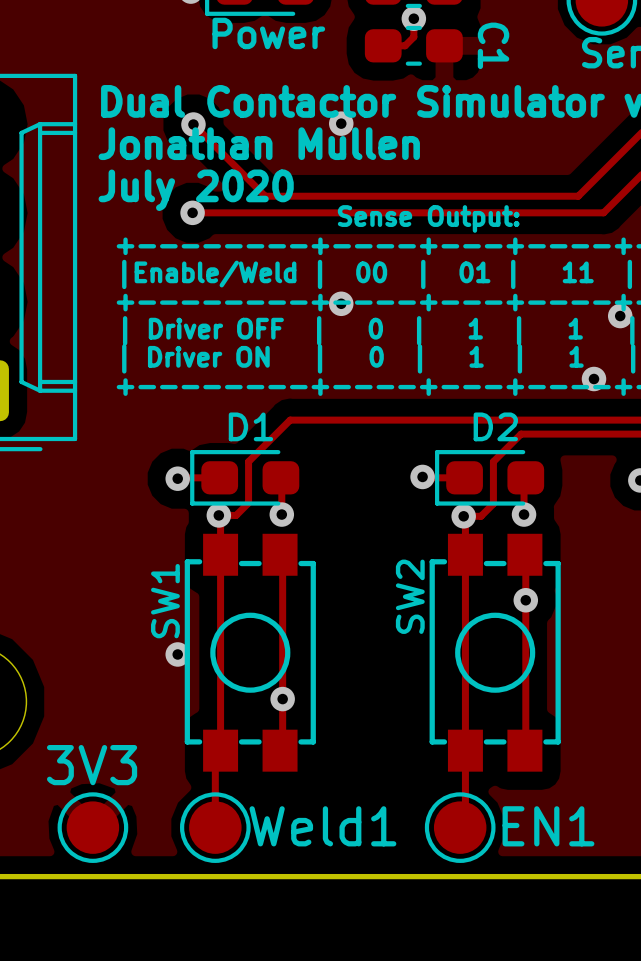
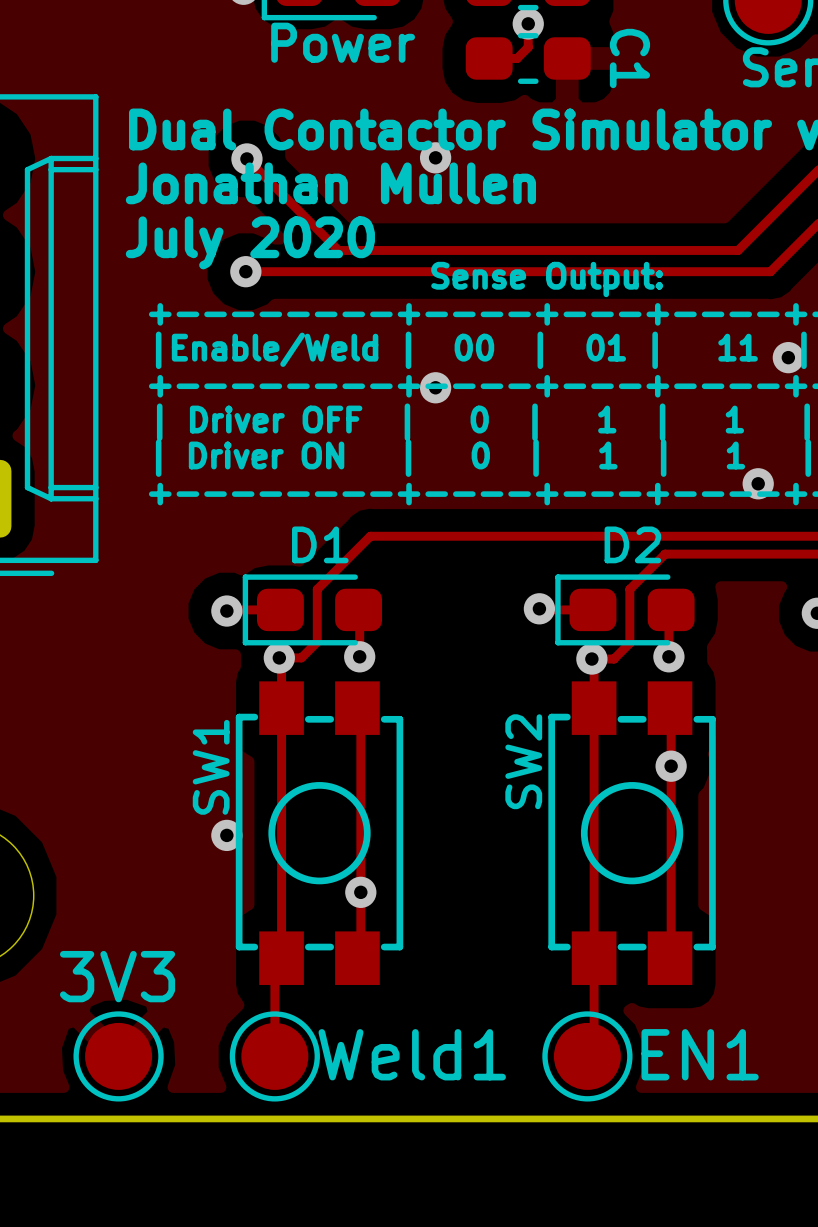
via position: (620, 316) -> (788, 357)

